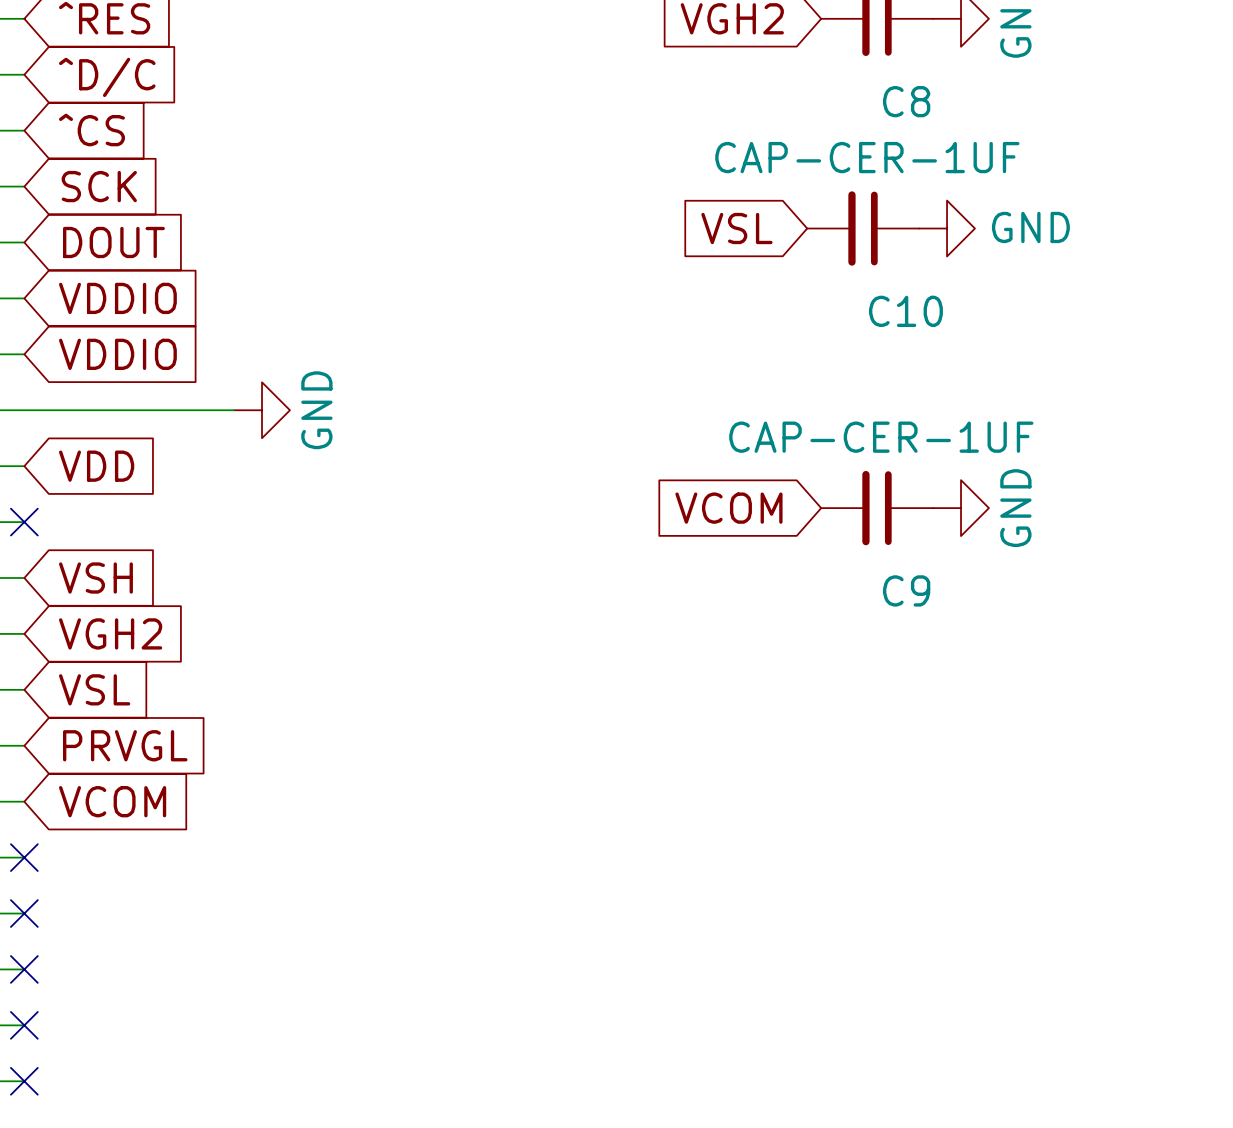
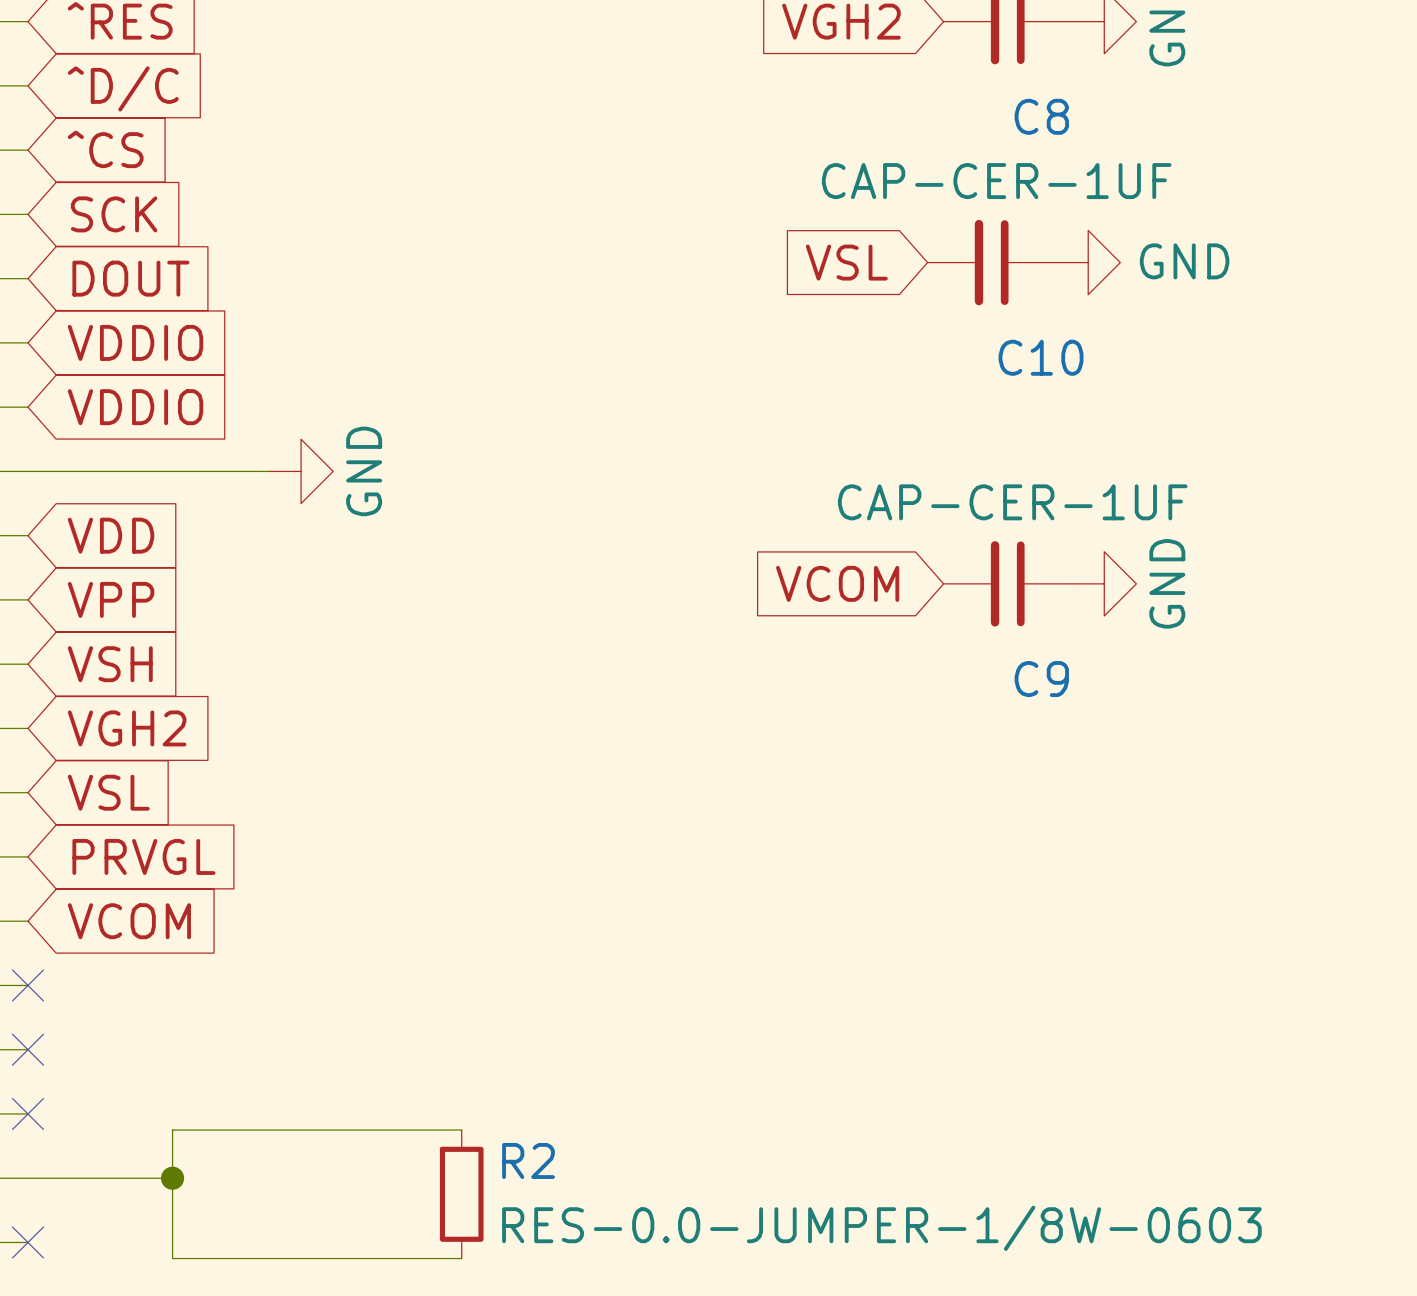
no-connect mark: (24, 522) -> none
global label: none -> VPP (111, 599)
wire: none -> (461, 1130) (172, 1130) (172, 1258) (461, 1258)
wire: none -> (27, 1178) (172, 1178)
no-connect mark: (24, 1025) -> none
junction: none -> (172, 1178)
R2: none -> RES-0.0-JUMPER-1/8W-0603 (461, 1194)

